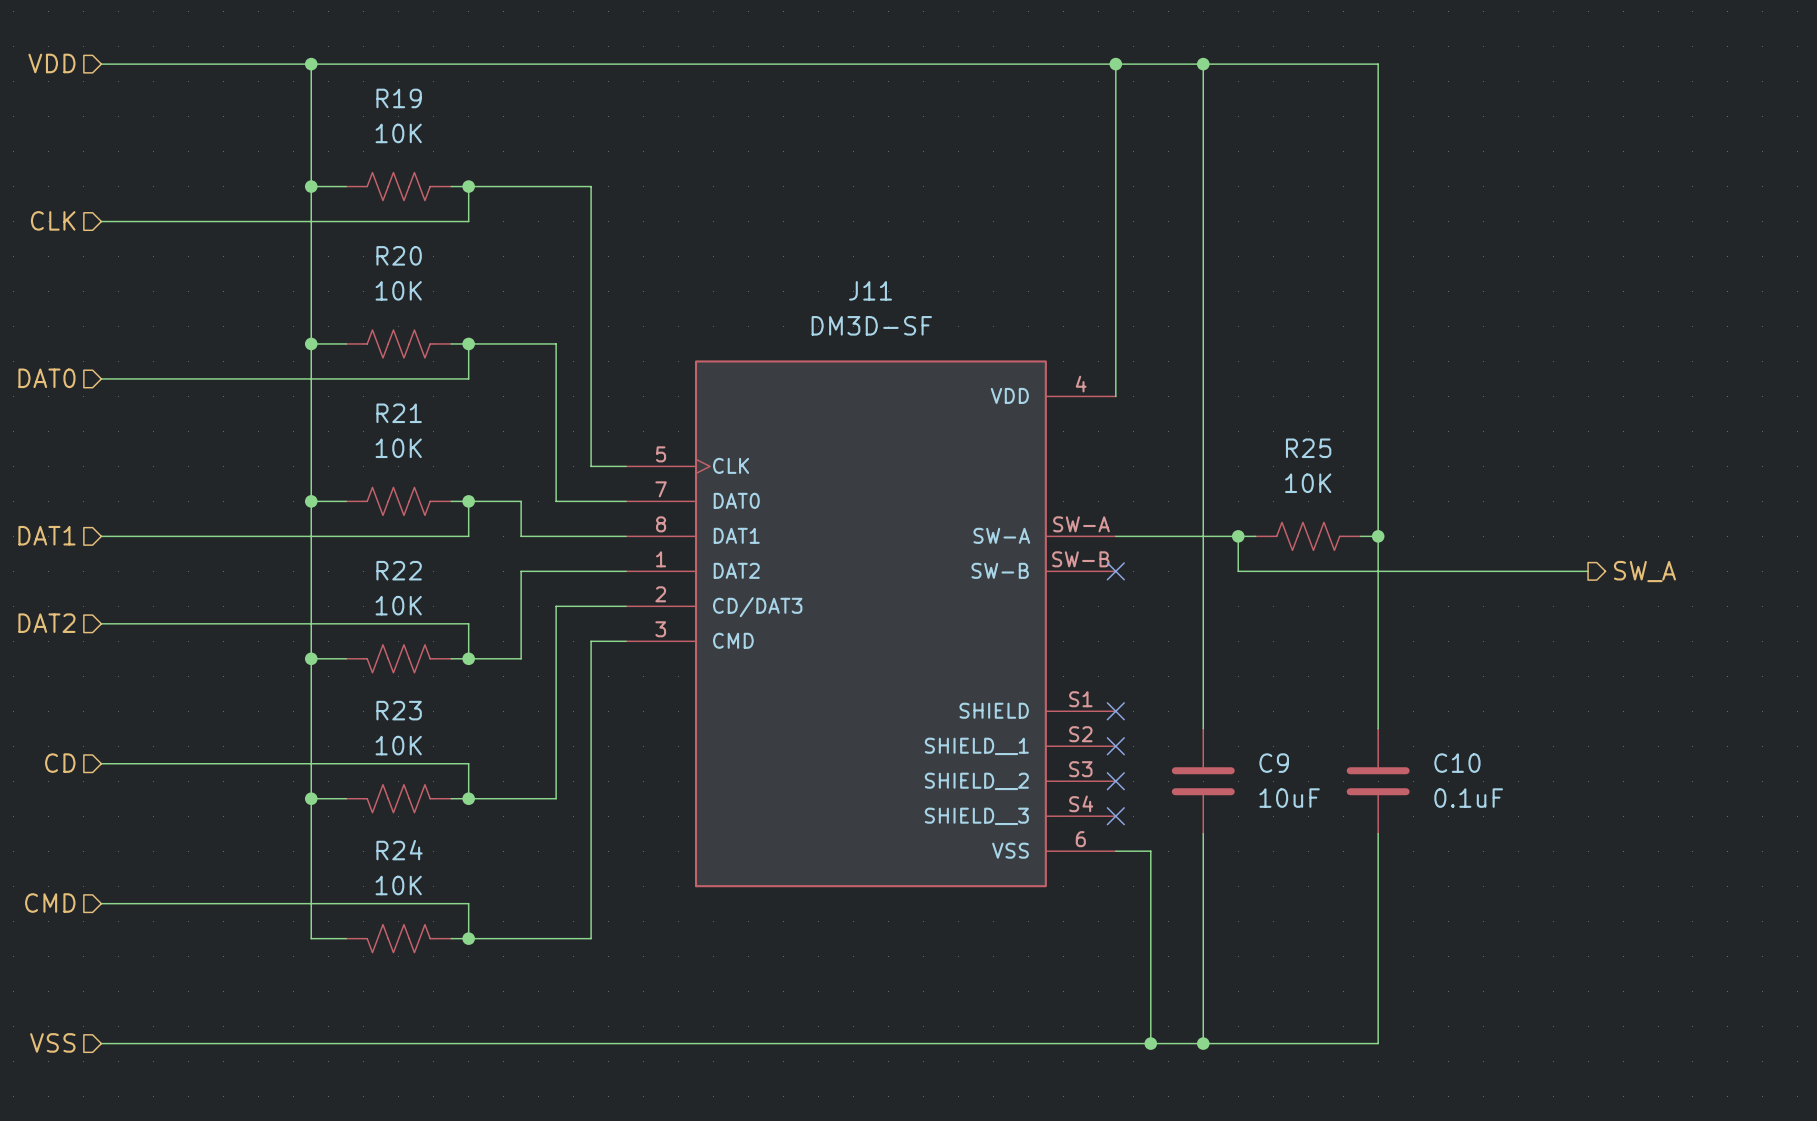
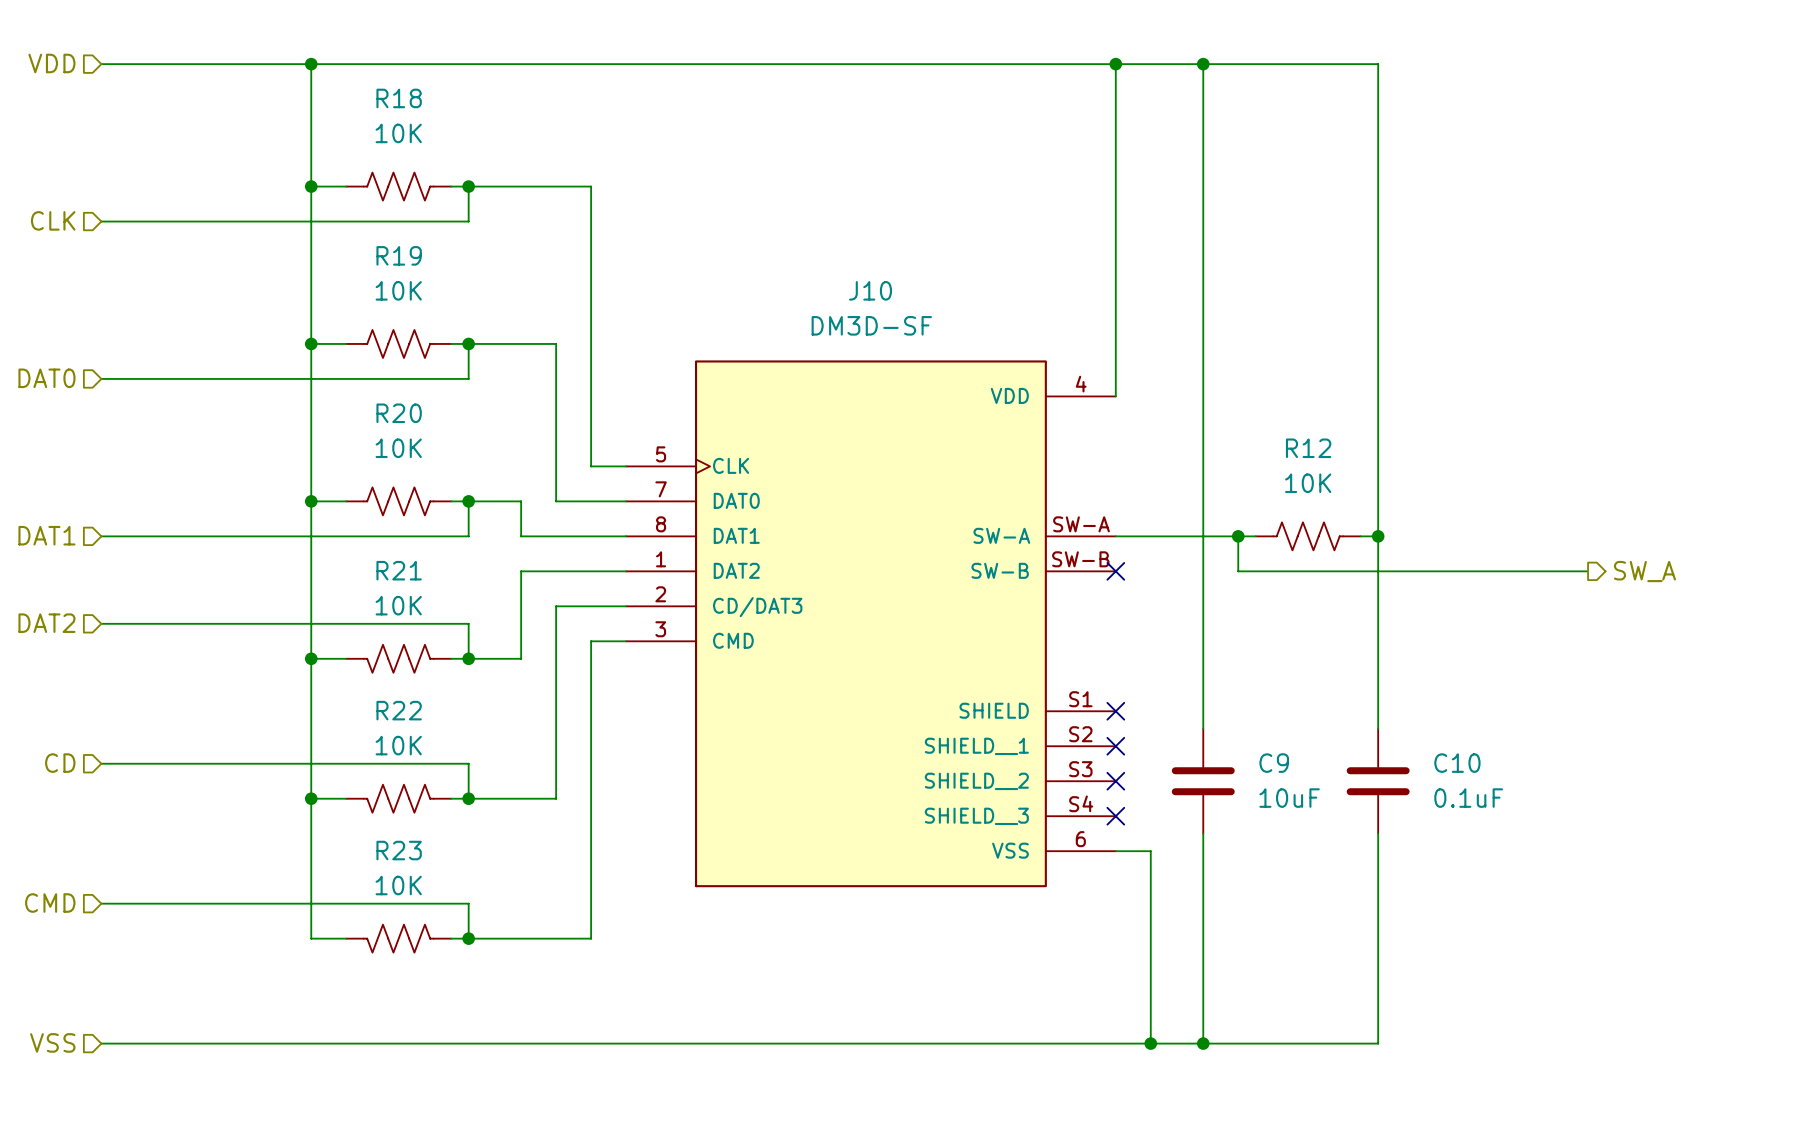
R19 name: R19 (399, 98) -> R18 (399, 98)
R20 name: R20 (399, 255) -> R19 (399, 255)
J11 name: J11 (870, 290) -> J10 (870, 290)
R21 name: R21 (399, 413) -> R20 (399, 413)
R25 name: R25 (1308, 448) -> R12 (1308, 448)
R22 name: R22 (399, 570) -> R21 (399, 570)
R23 name: R23 (399, 710) -> R22 (399, 710)
R24 name: R24 (399, 850) -> R23 (399, 850)

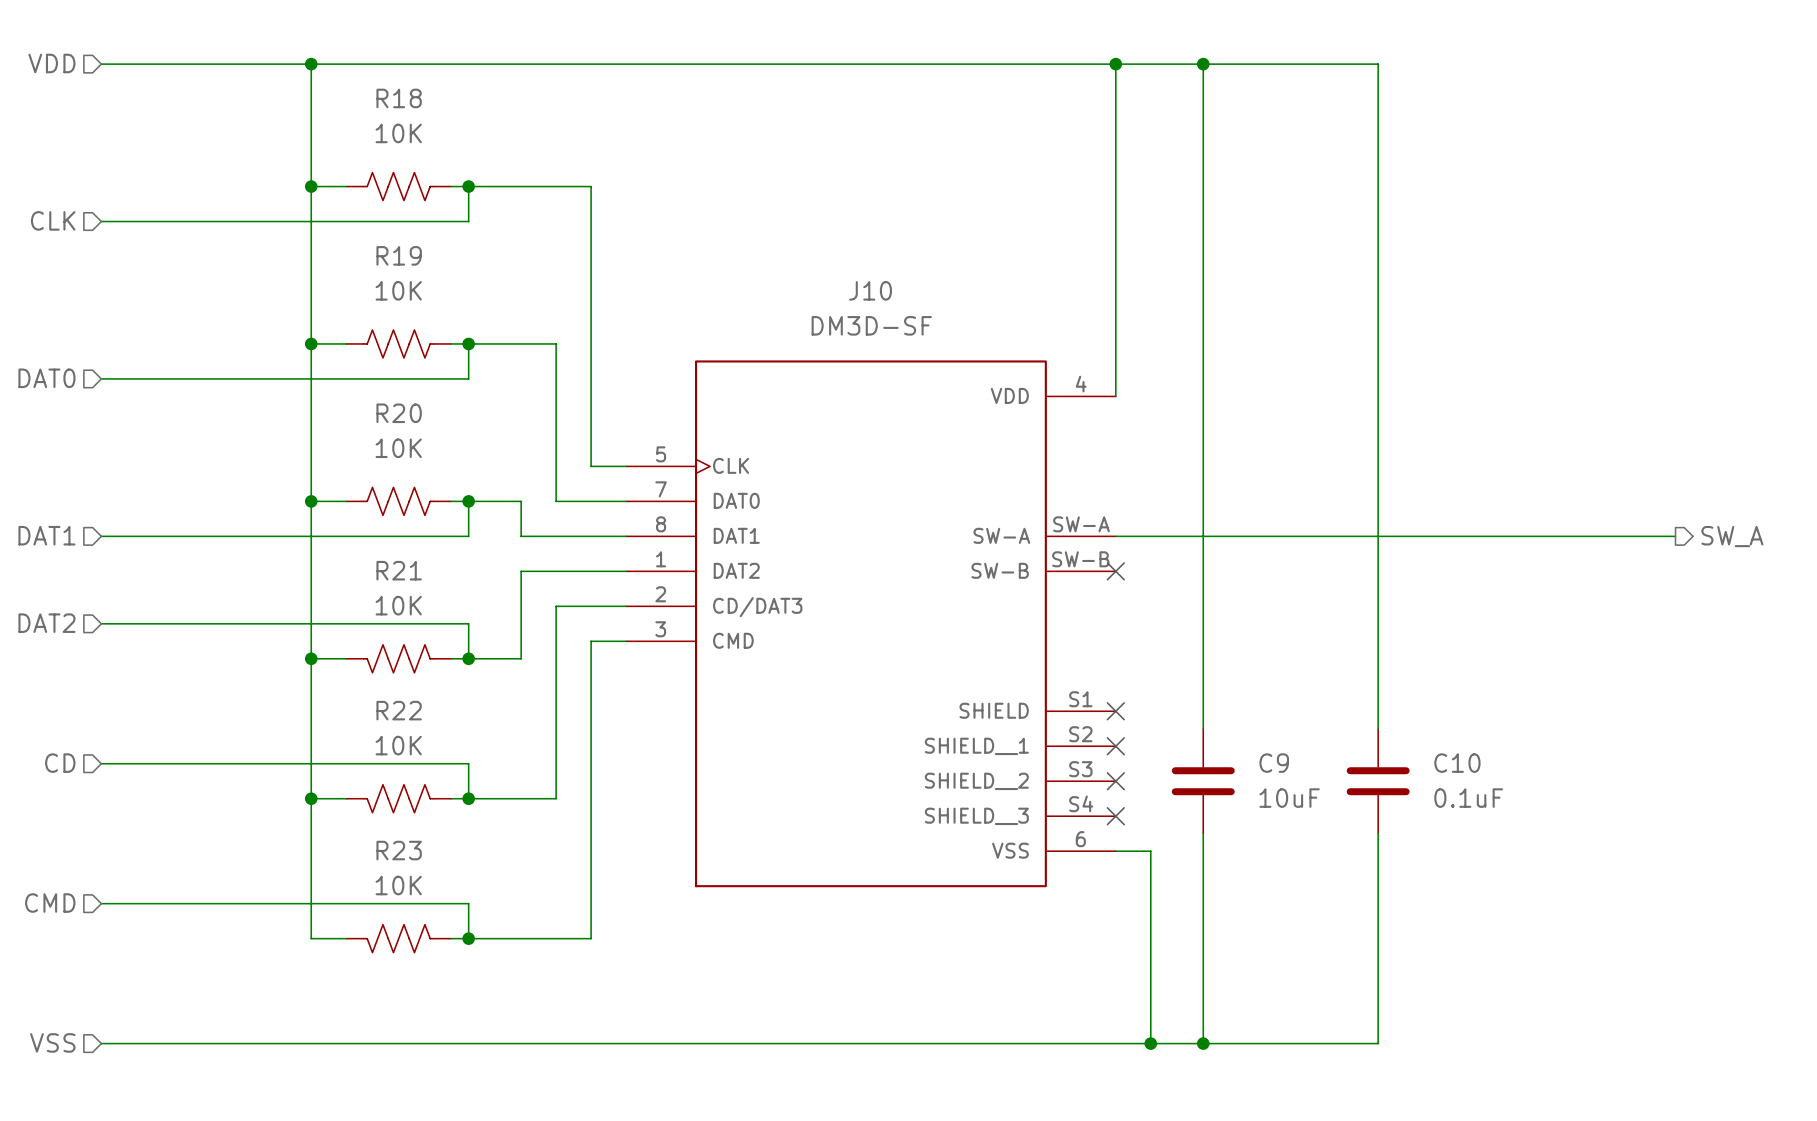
wire: (1238, 536) (1238, 571) (1588, 571) -> none
junction: (1238, 536) -> none
wire: none -> (1255, 536) (1360, 536)
R12: 10K (1308, 536) -> none
wire: none -> (1378, 536) (1675, 536)
junction: (1378, 536) -> none
hierarchical label position: SW_A (1644, 571) -> SW_A (1732, 536)

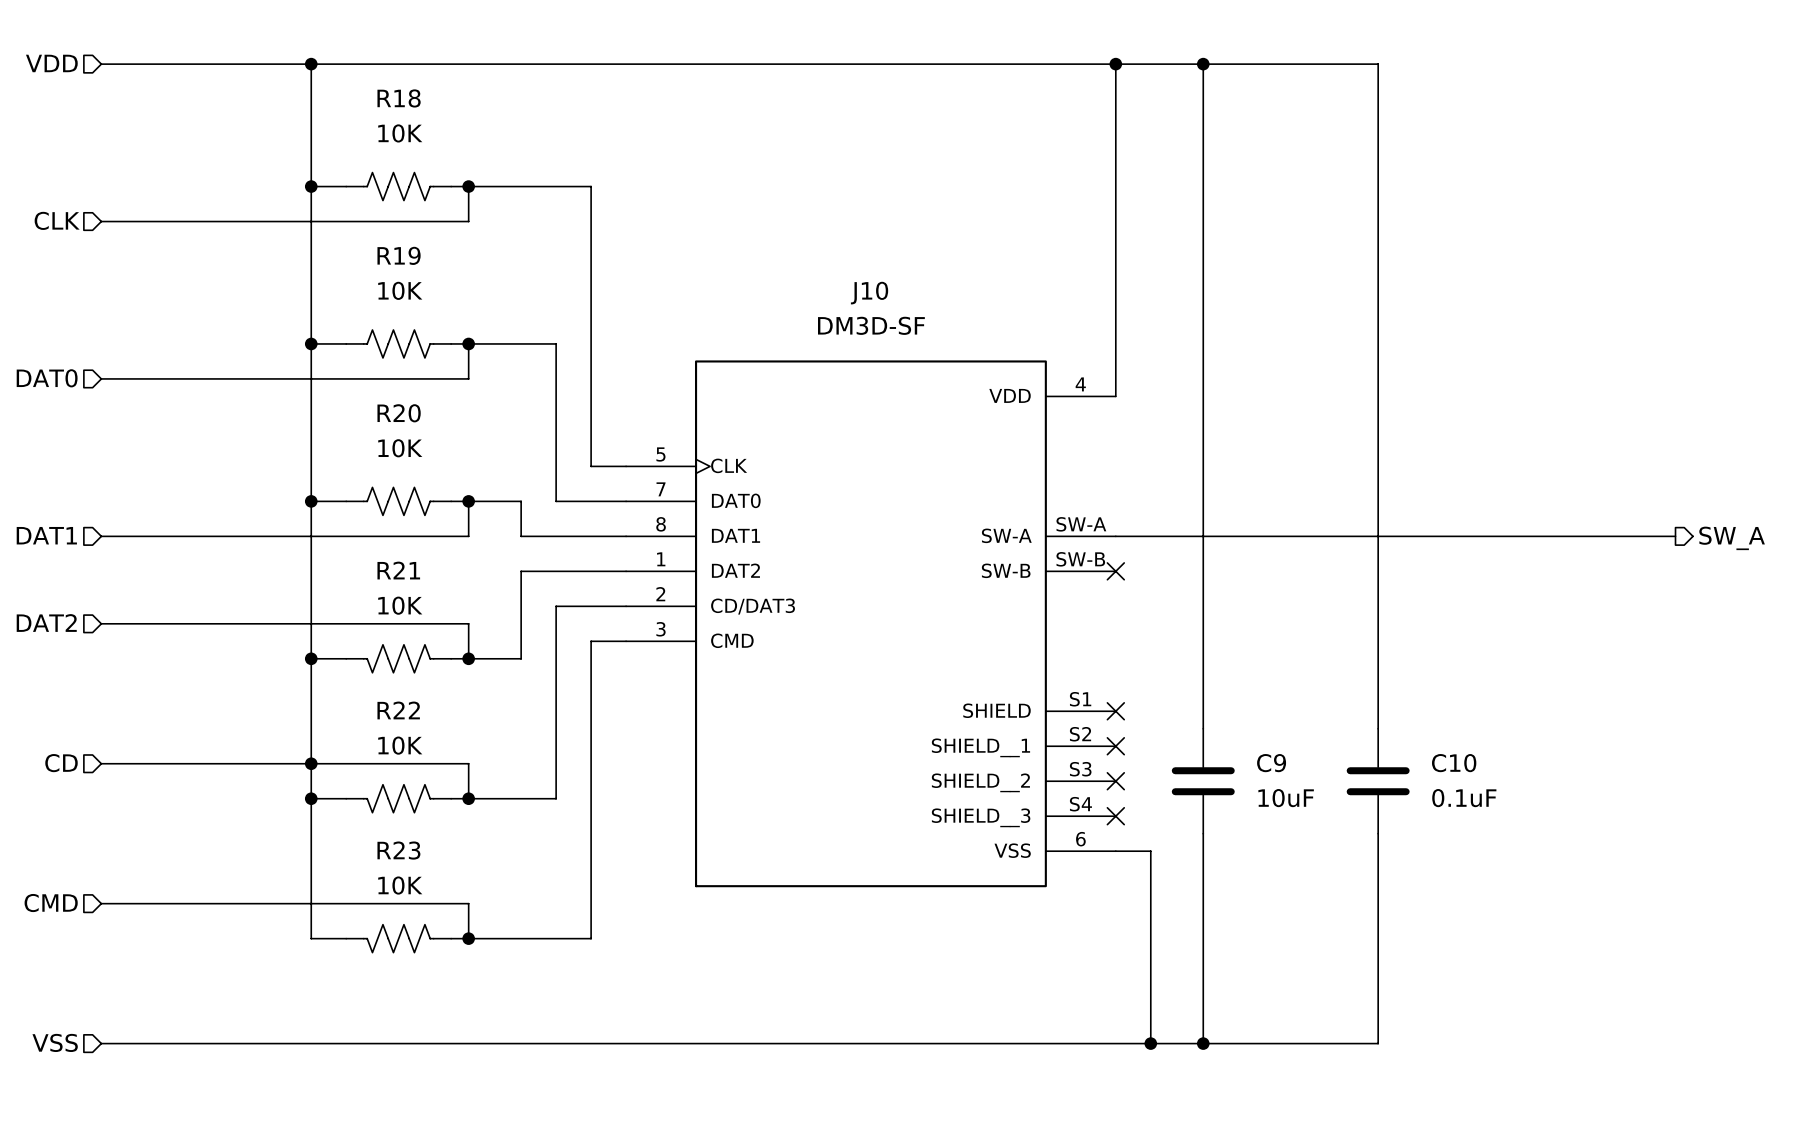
junction: none -> (311, 763)

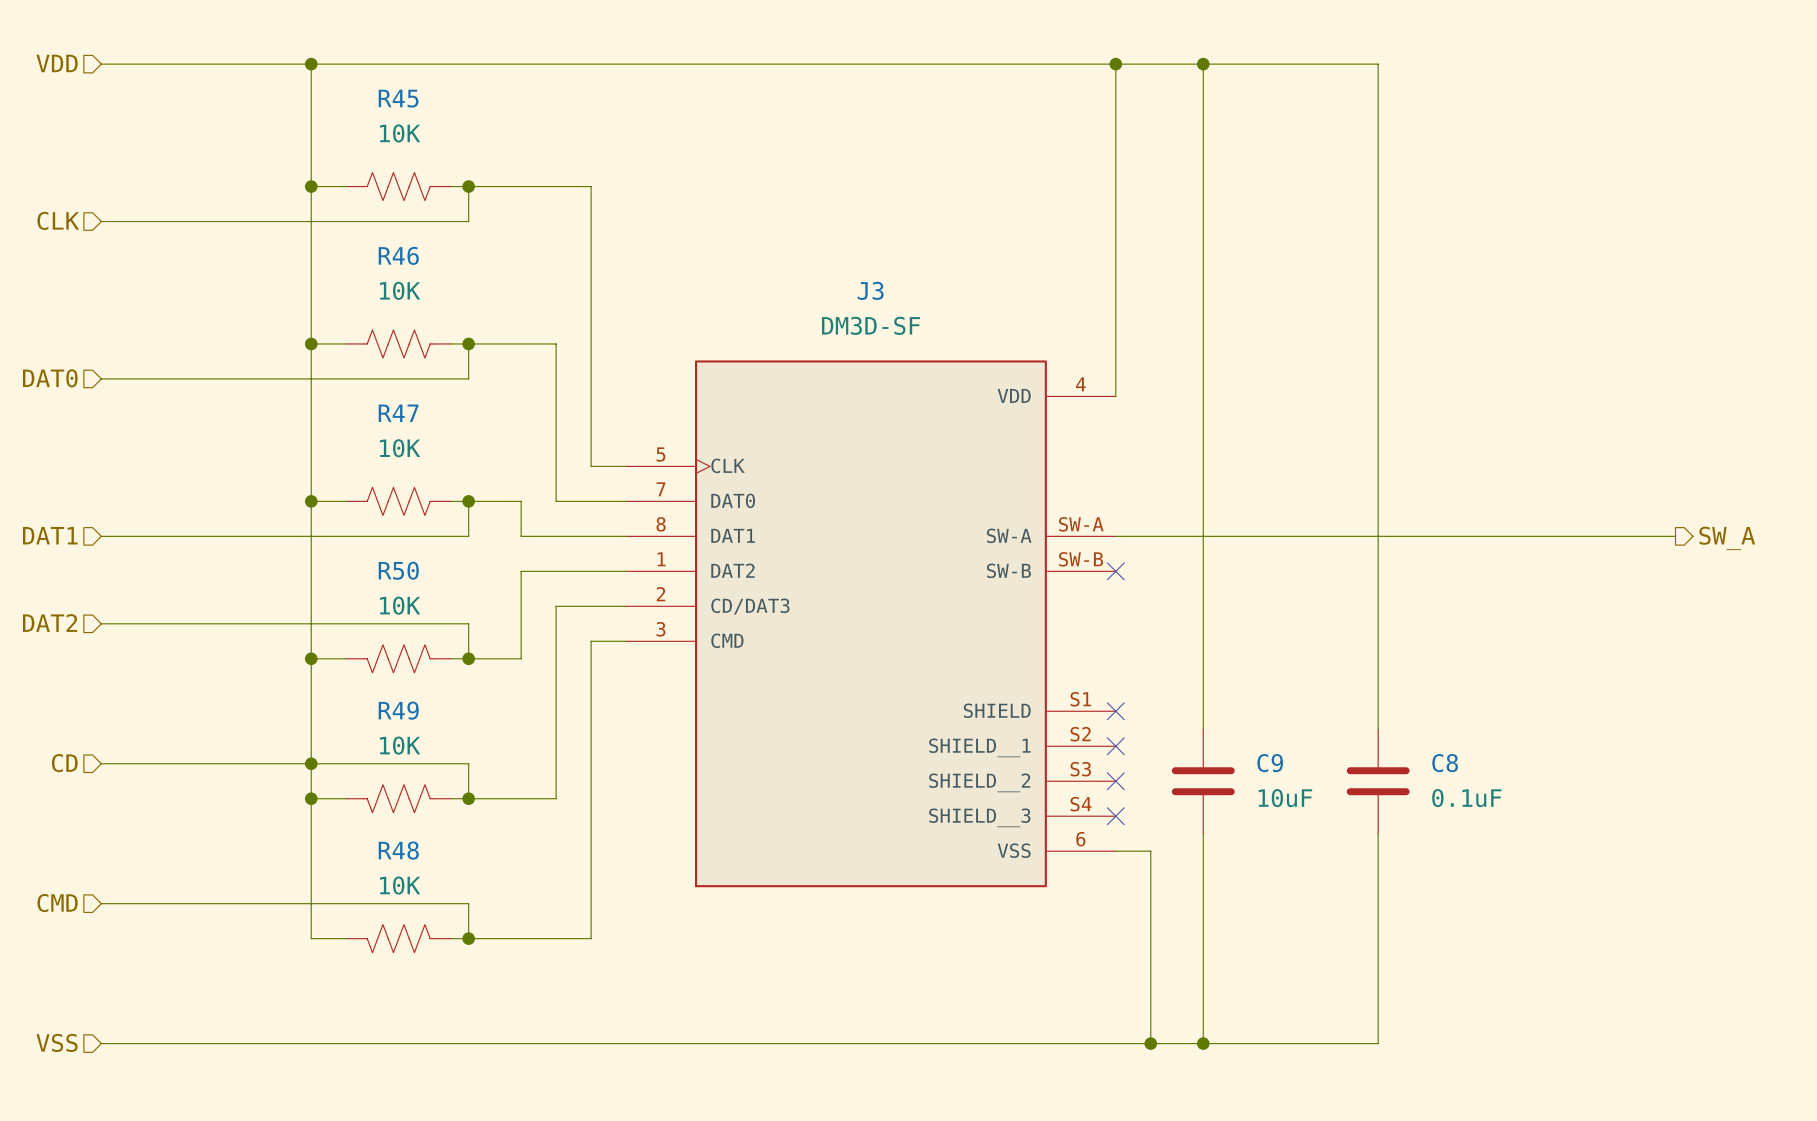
R18 name: R18 (399, 98) -> R45 (398, 98)
R19 name: R19 (399, 255) -> R46 (398, 255)
J10 name: J10 (869, 293) -> J3 (870, 290)
R20 name: R20 (399, 413) -> R47 (398, 413)
R21 name: R21 (398, 570) -> R50 (398, 570)
R22 name: R22 (398, 710) -> R49 (398, 710)
C10 name: C10 (1454, 763) -> C8 (1445, 763)
R23 name: R23 (398, 850) -> R48 (398, 850)

